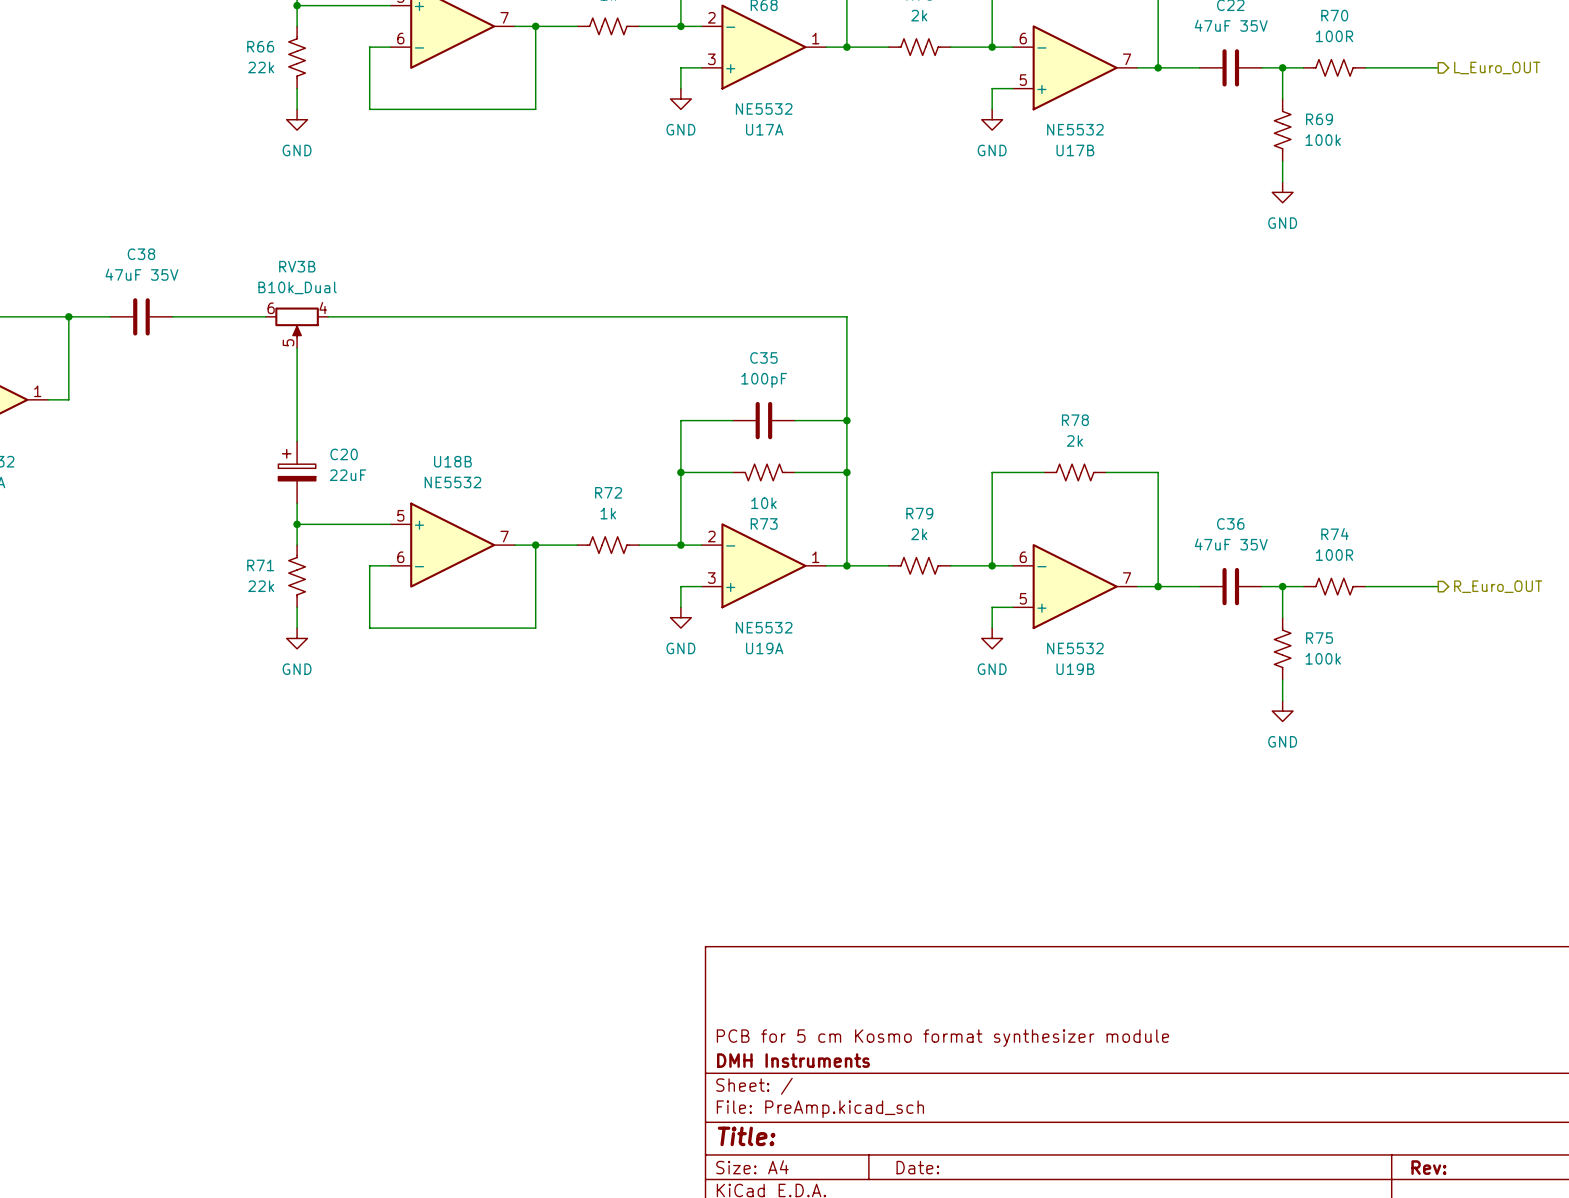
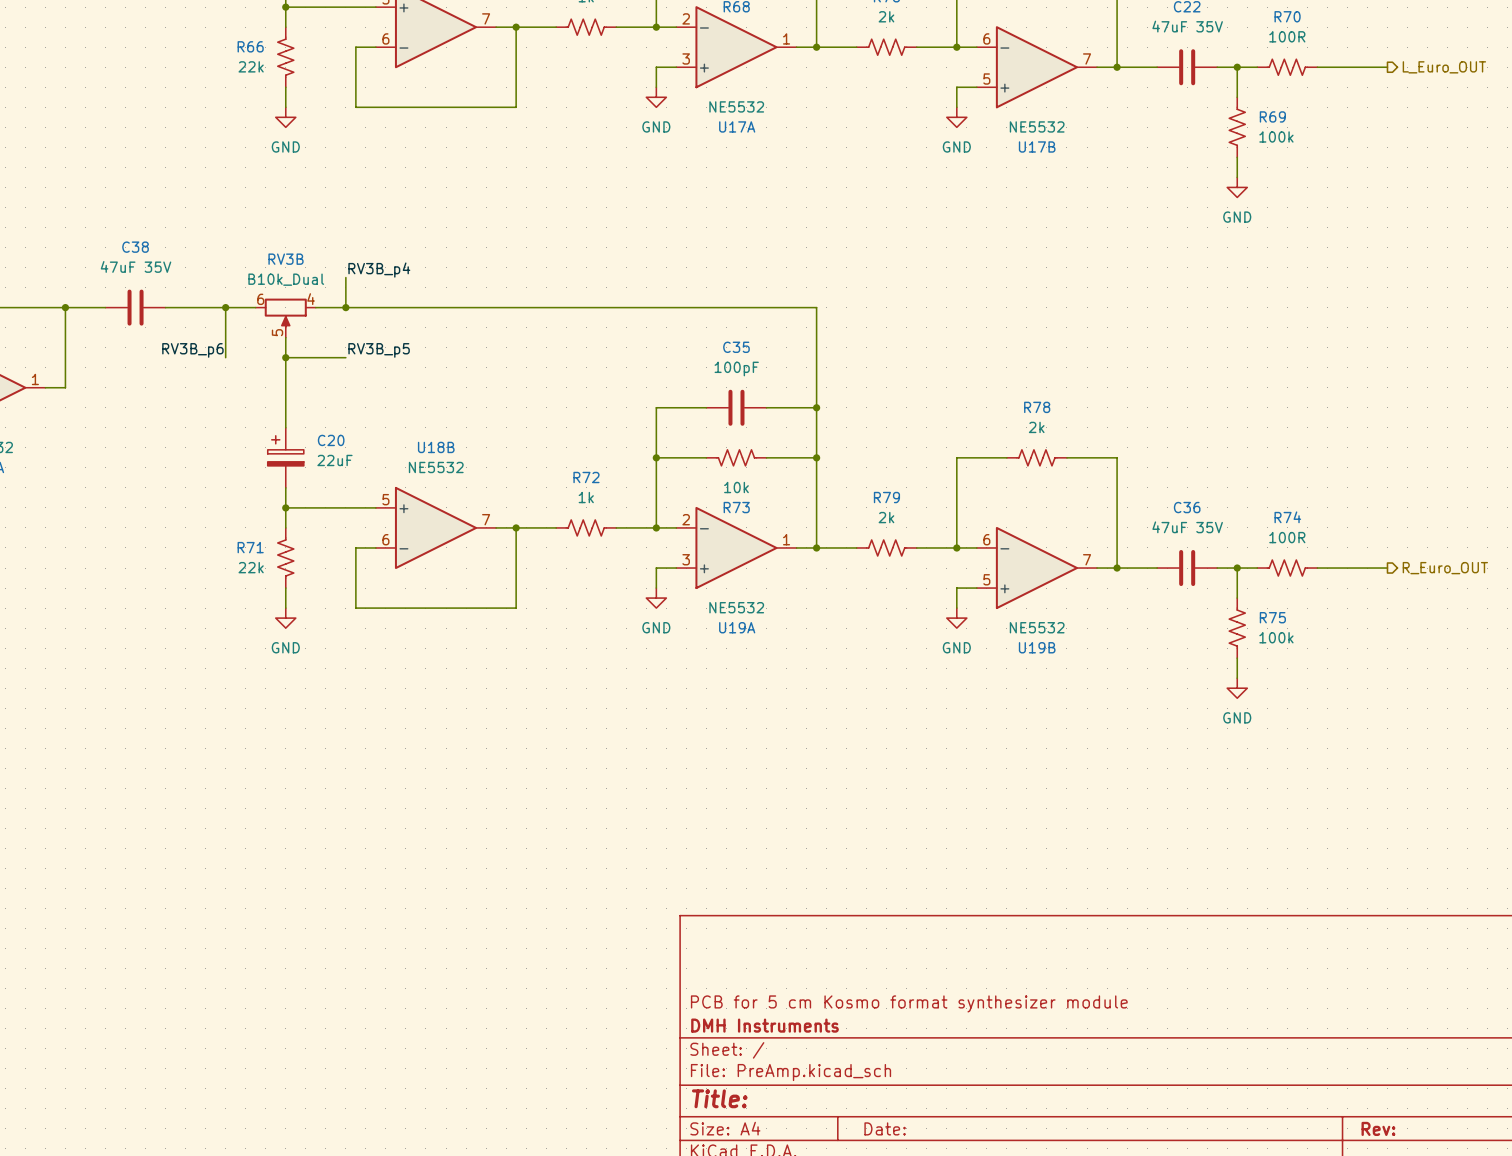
label: none -> RV3B_p4 (379, 270)
wire: none -> (345, 277) (345, 307)
wire: none -> (225, 307) (225, 357)
junction: none -> (225, 307)
junction: none -> (345, 307)
label: none -> RV3B_p6 (192, 350)
label: none -> RV3B_p5 (379, 350)
wire: none -> (285, 357) (345, 357)
junction: none -> (285, 357)

